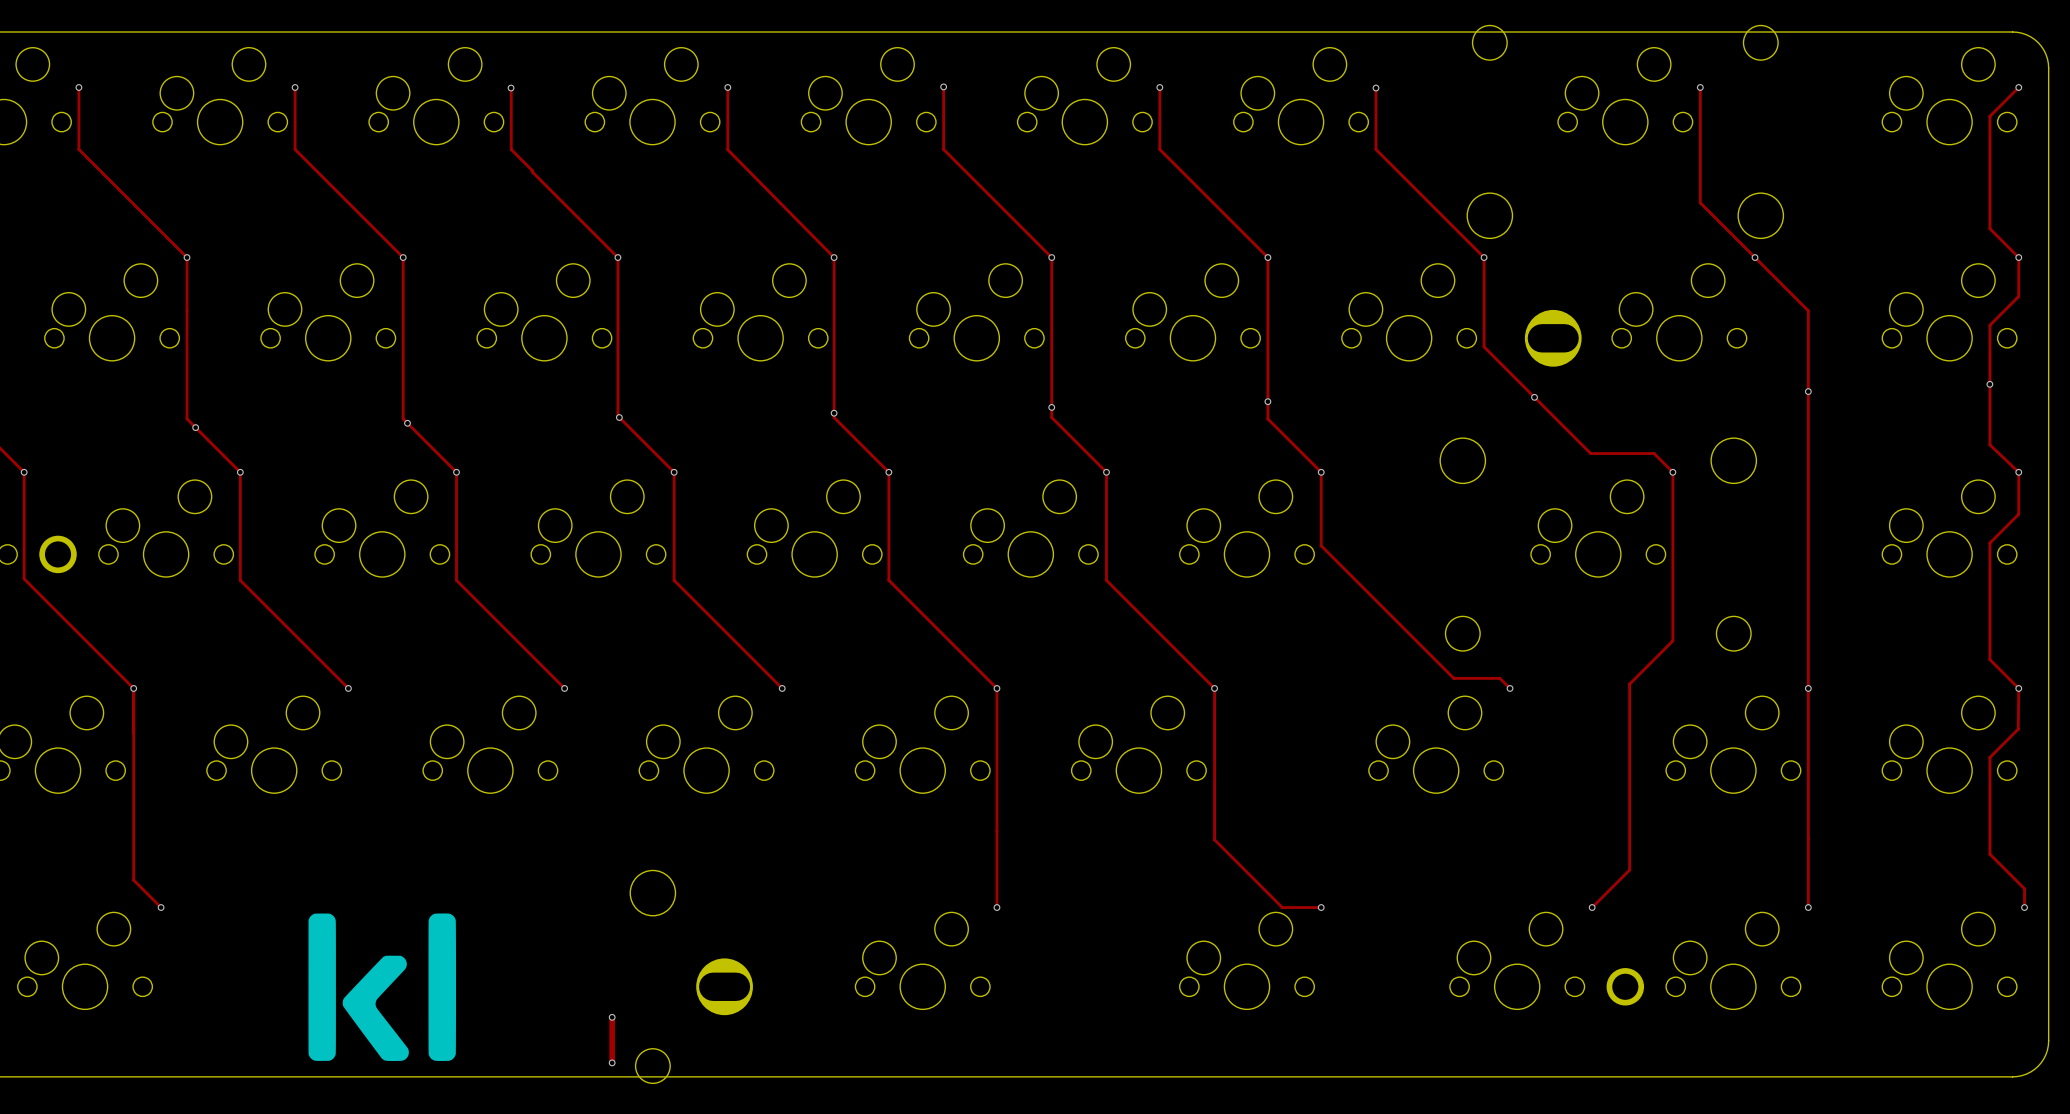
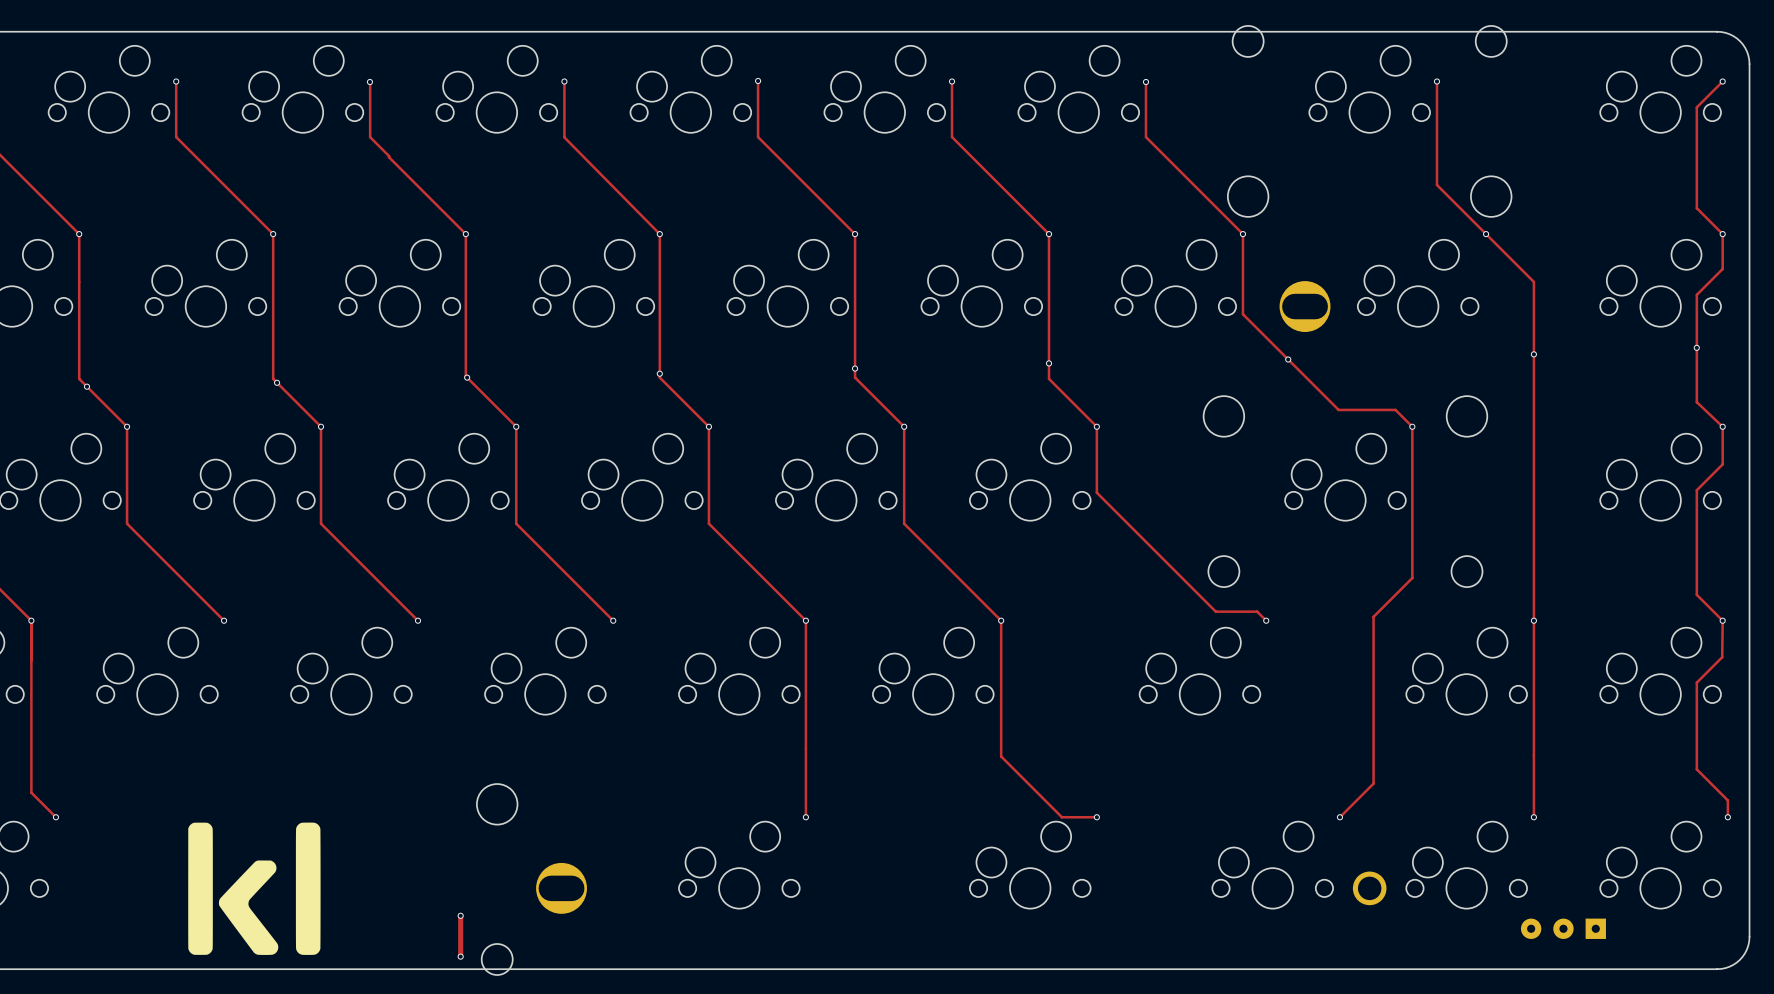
part: none -> (1563, 928)

